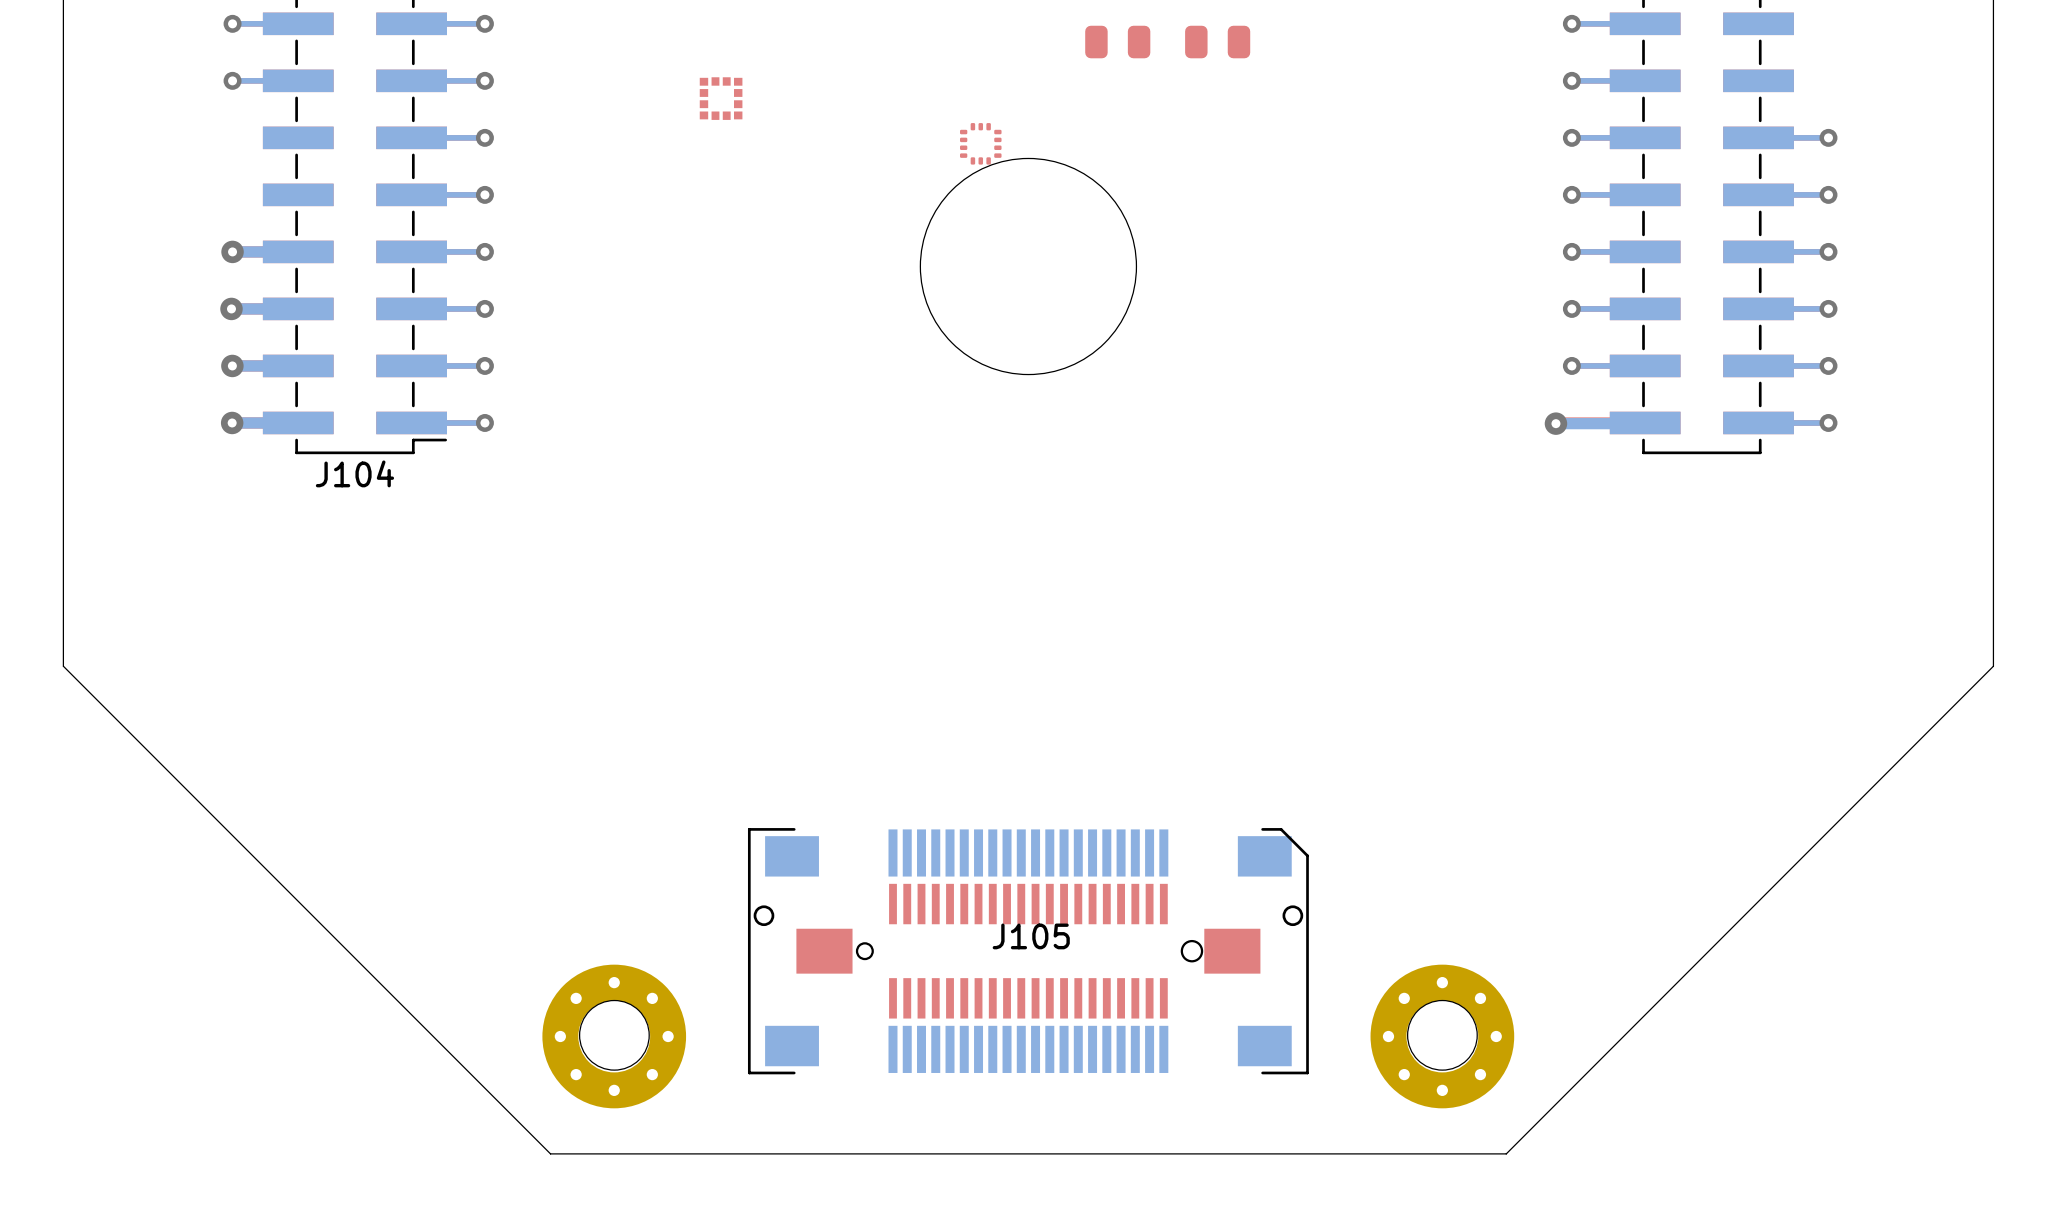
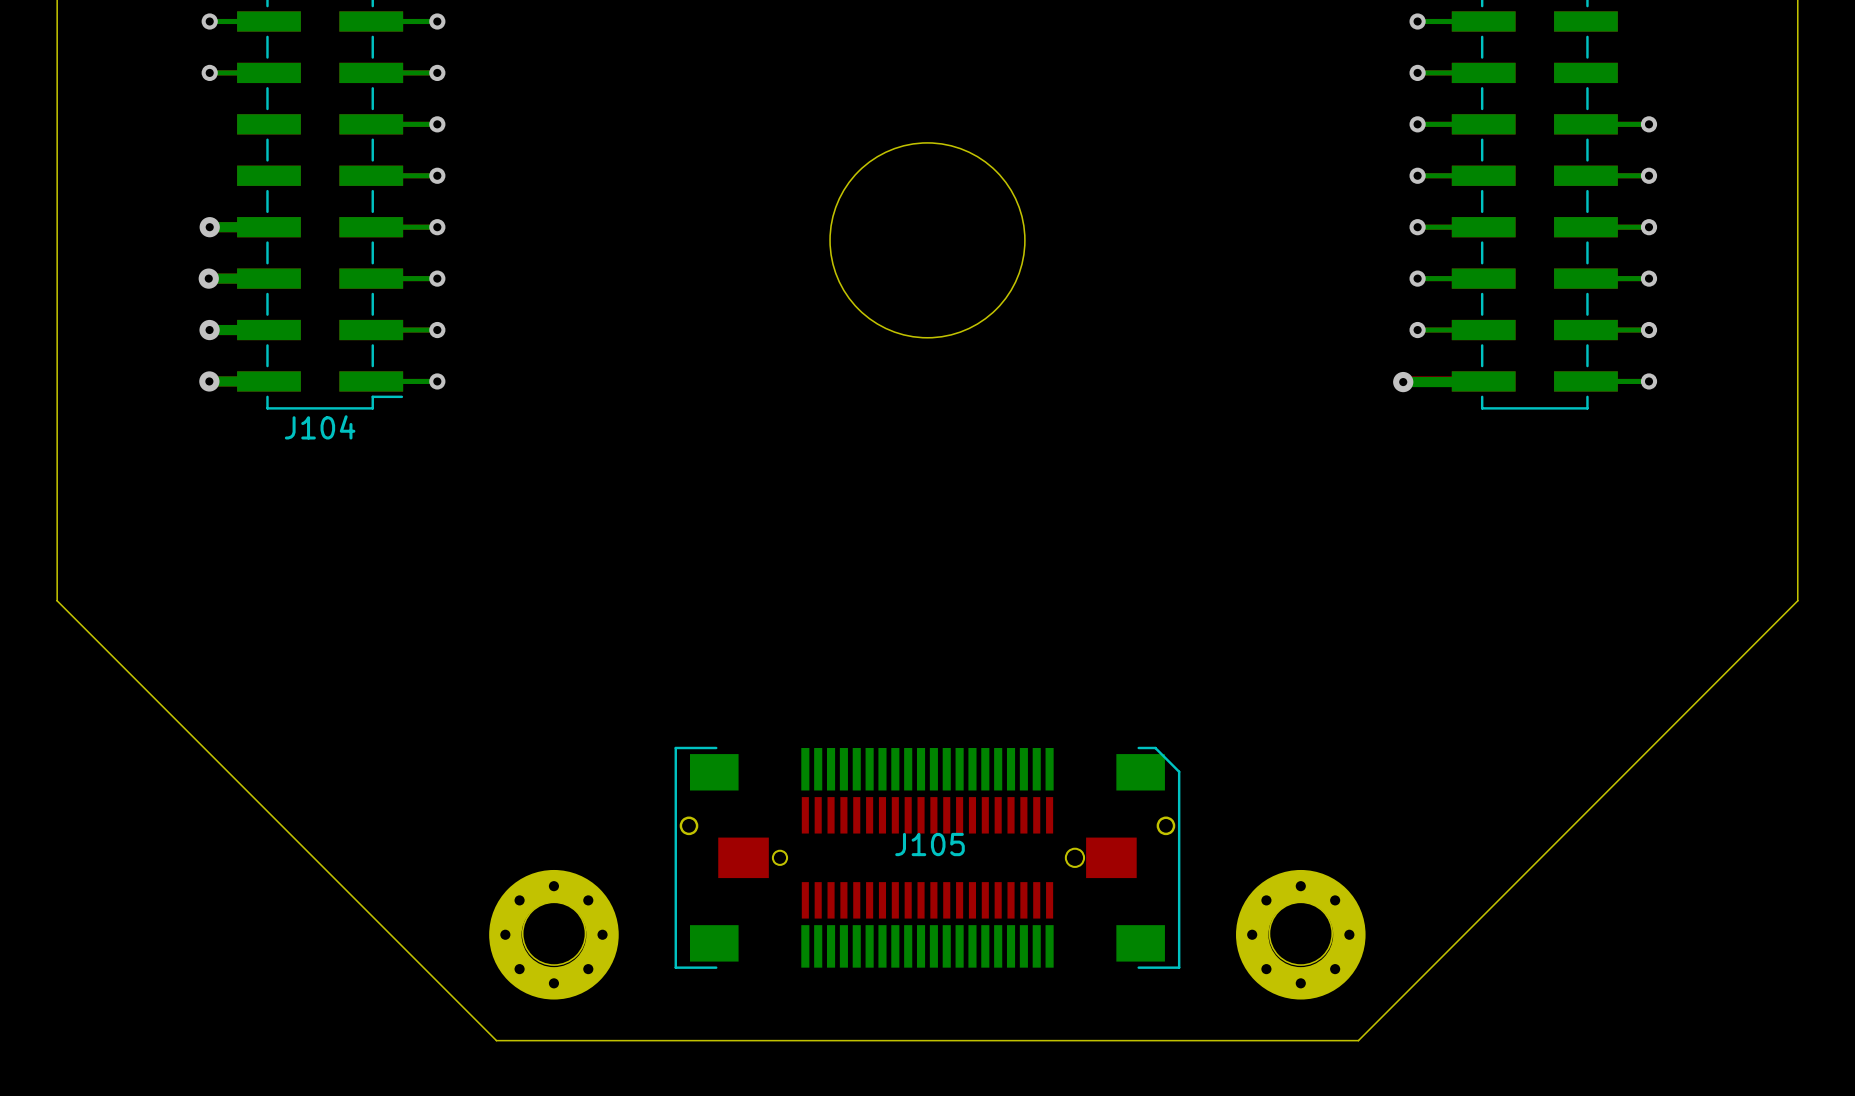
part: (1117, 42) -> none
part: (1217, 42) -> none
part: (721, 98) -> none
part: (980, 143) -> none

